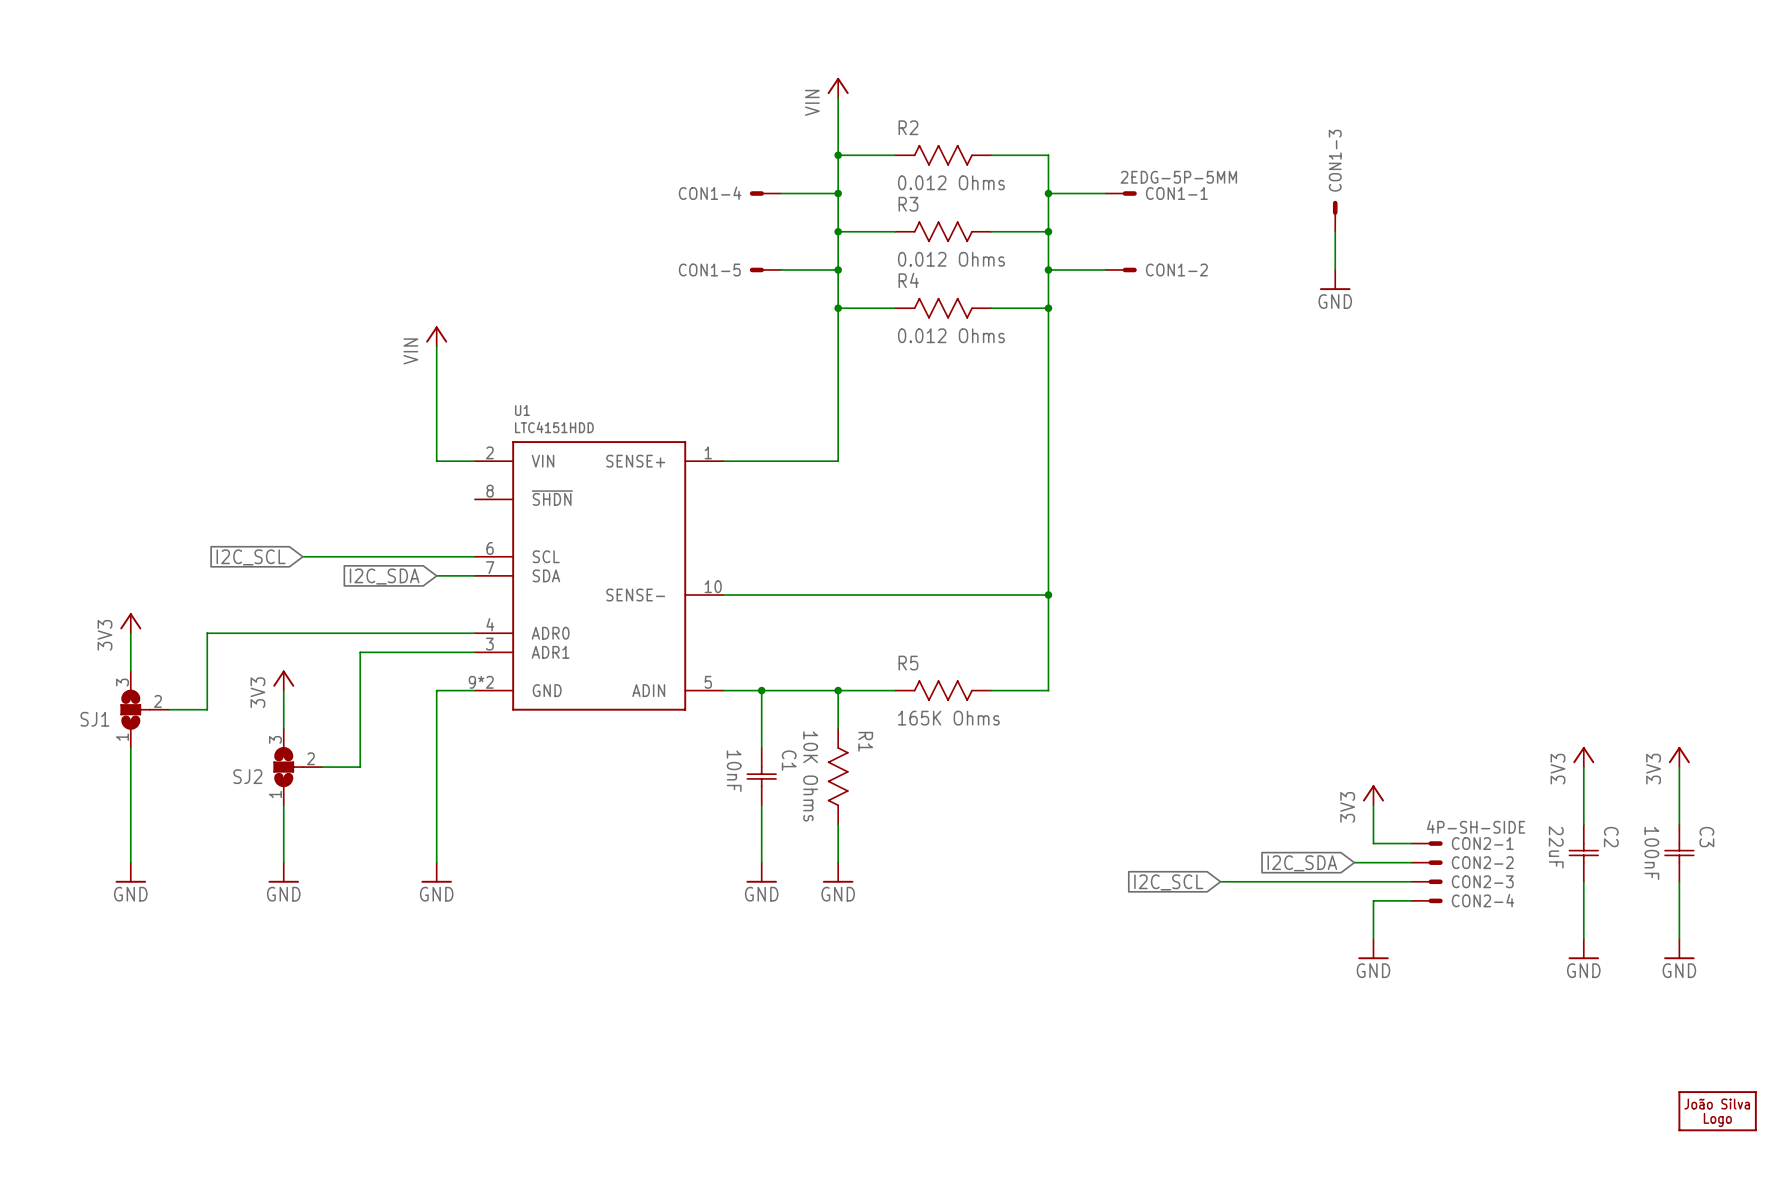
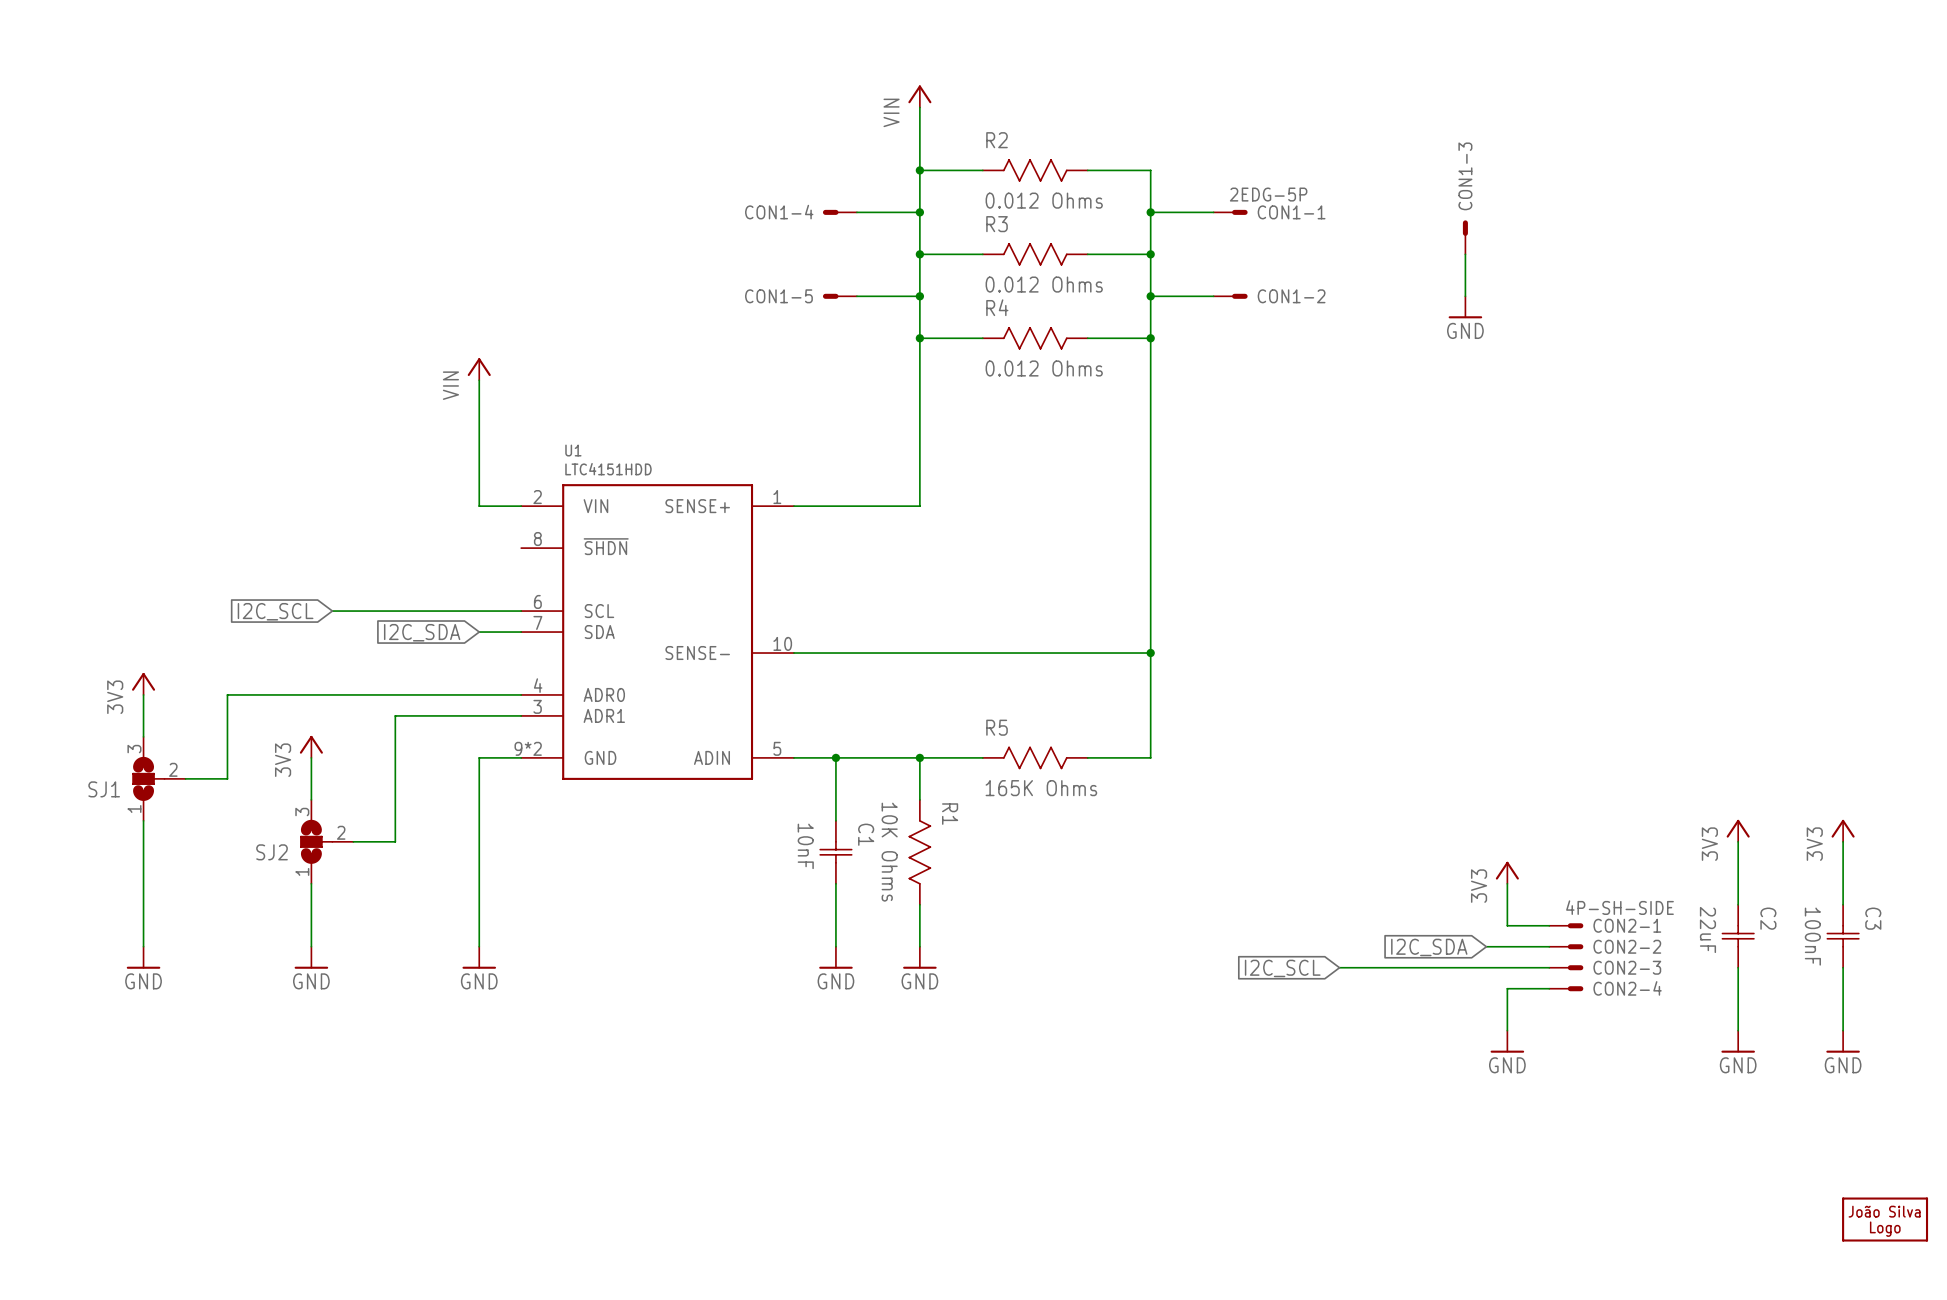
CON1-1 value: 2EDG-5P-5MM (1178, 177) -> 2EDG-5P (1268, 194)

